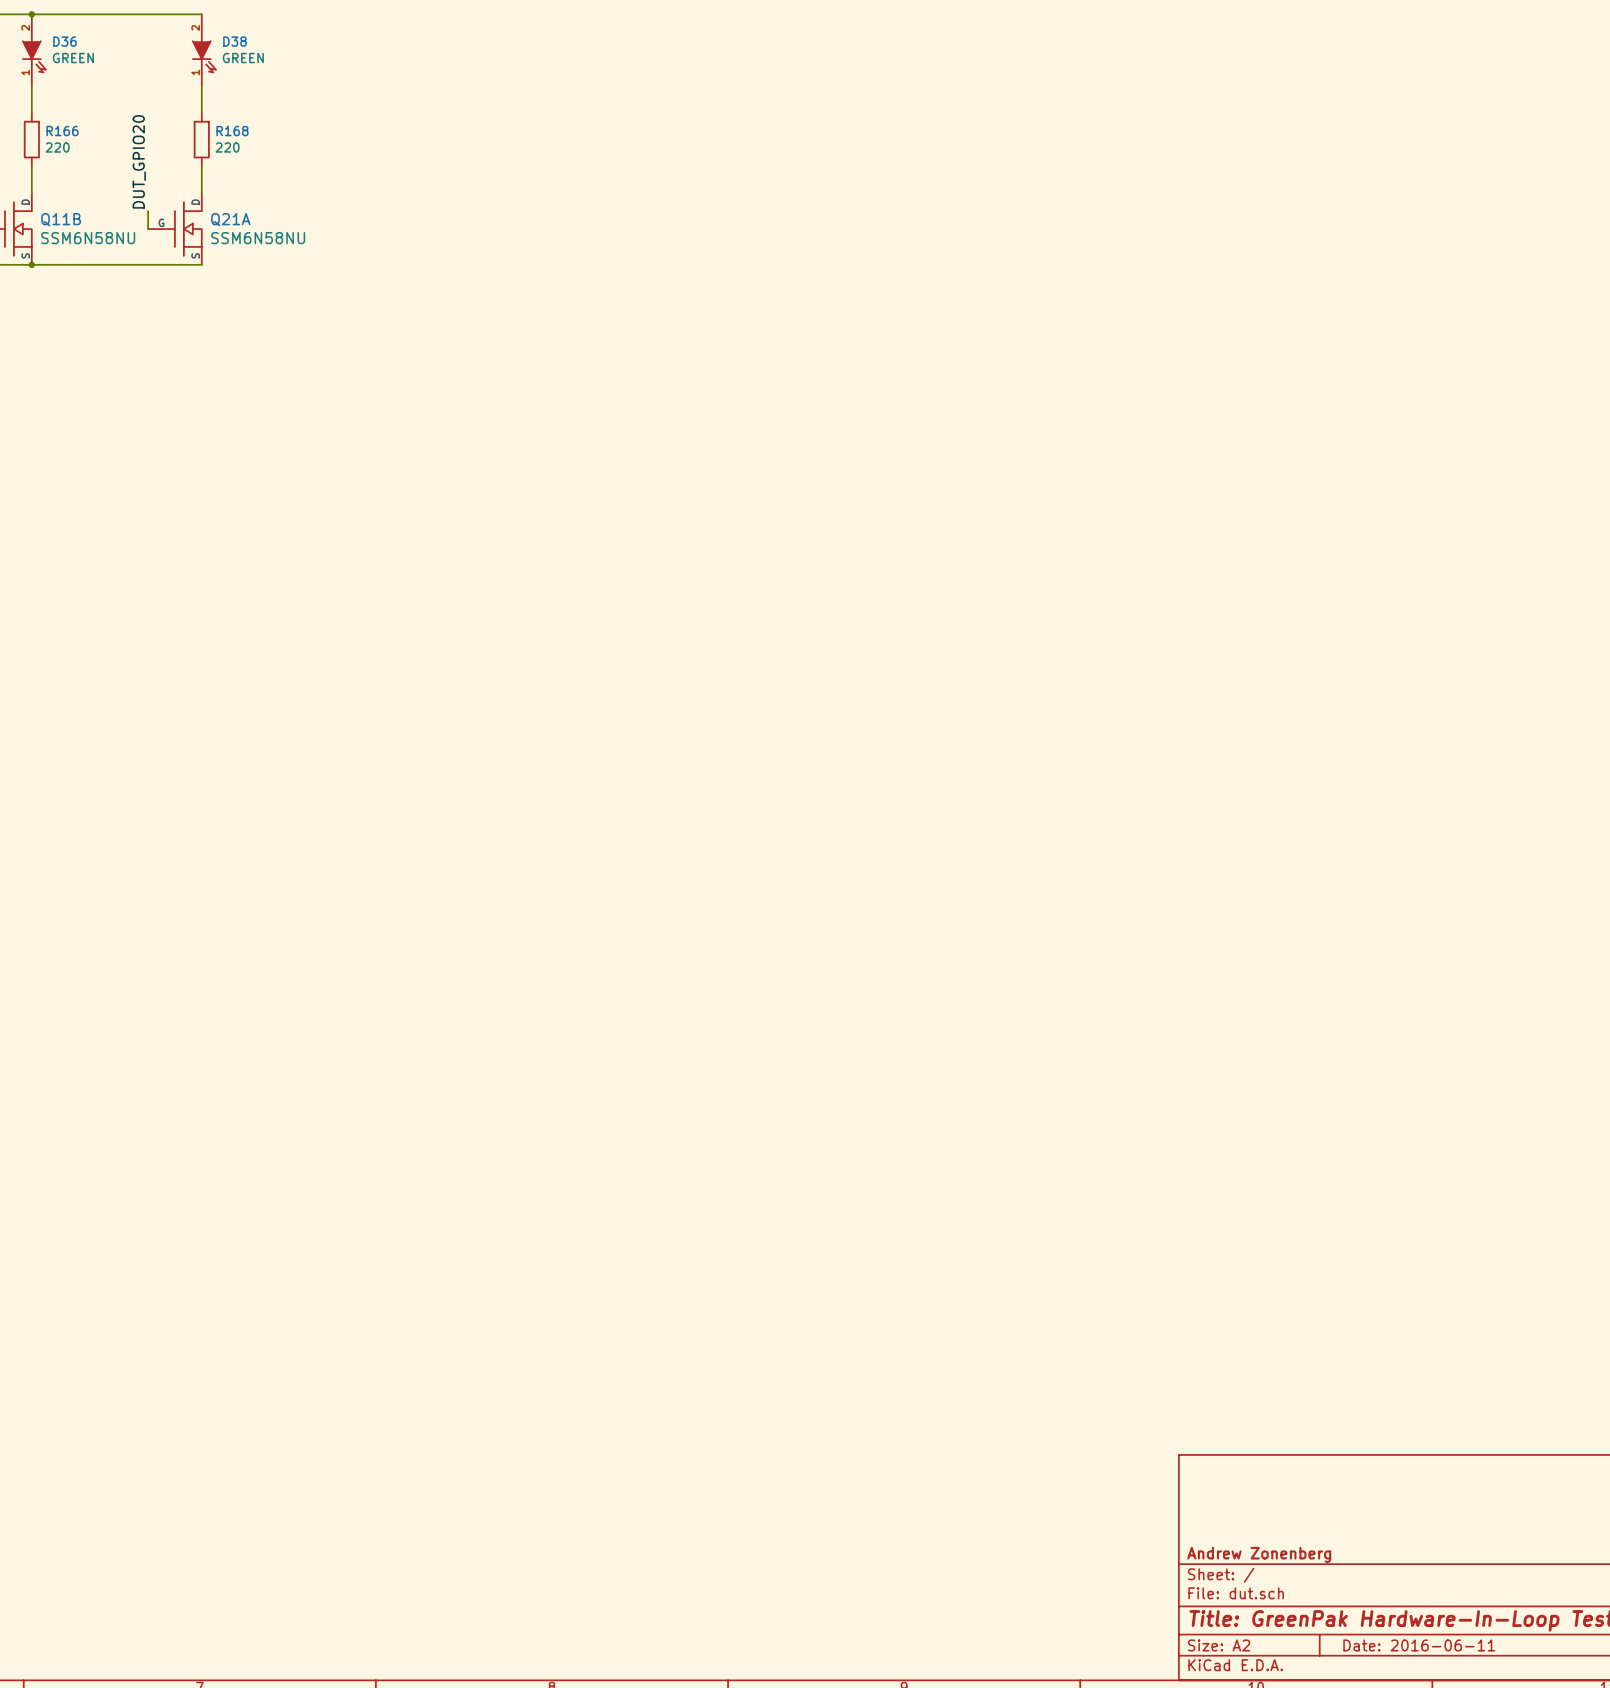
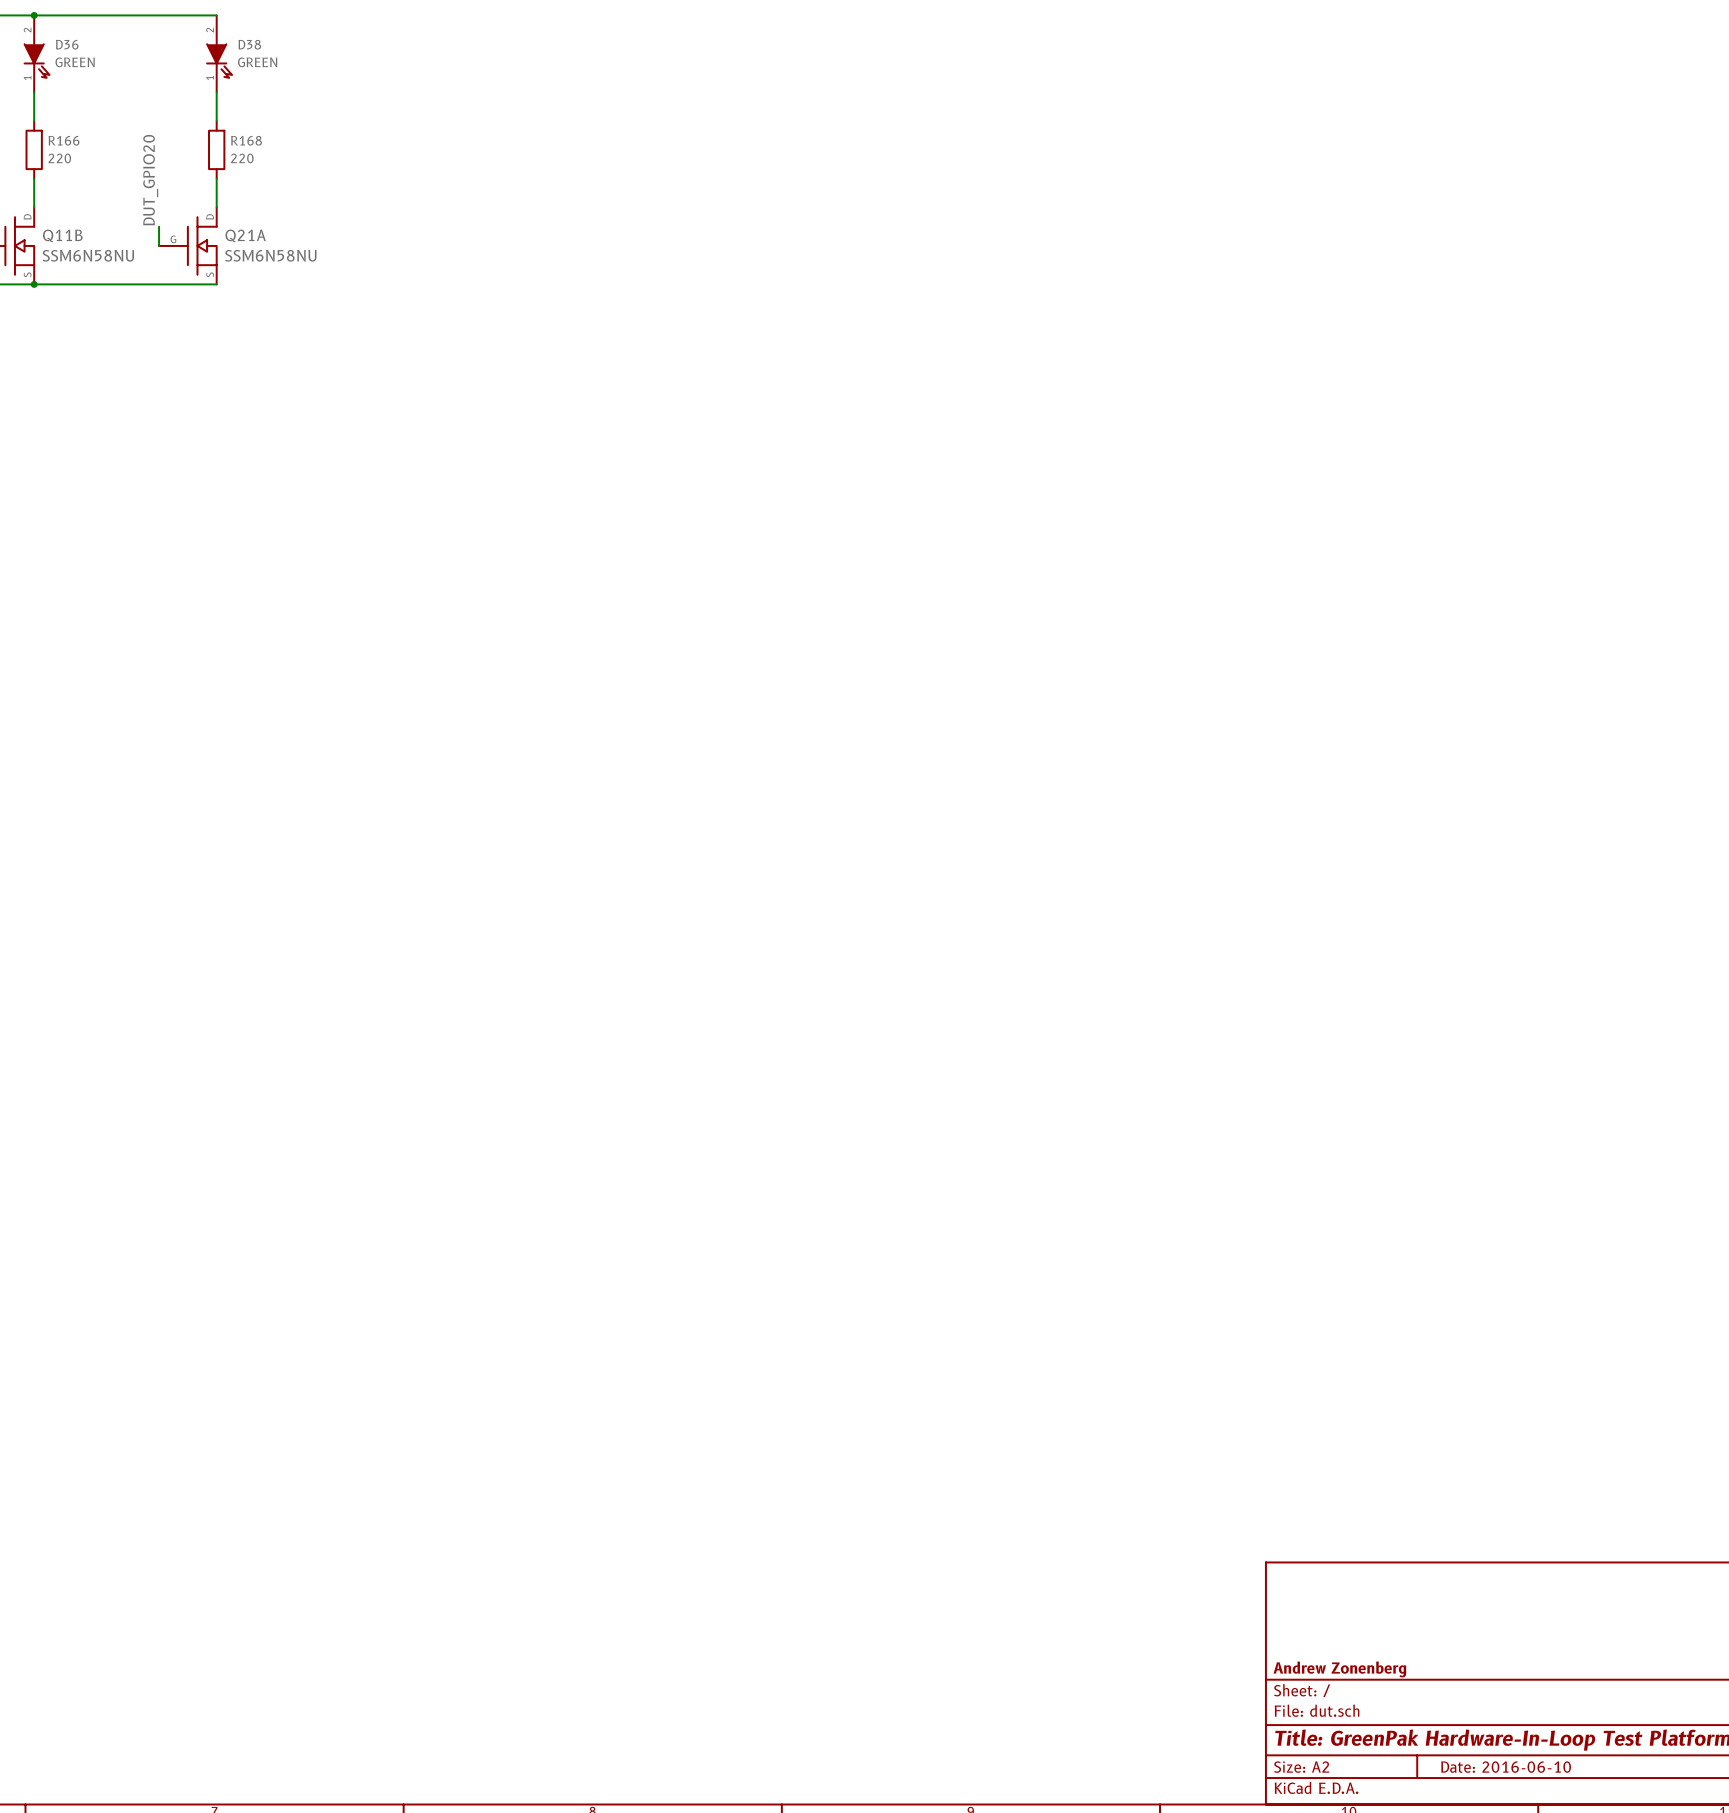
title block: Date: 2016-06-11 (1419, 1645) -> Date: 2016-06-10 (1506, 1767)

